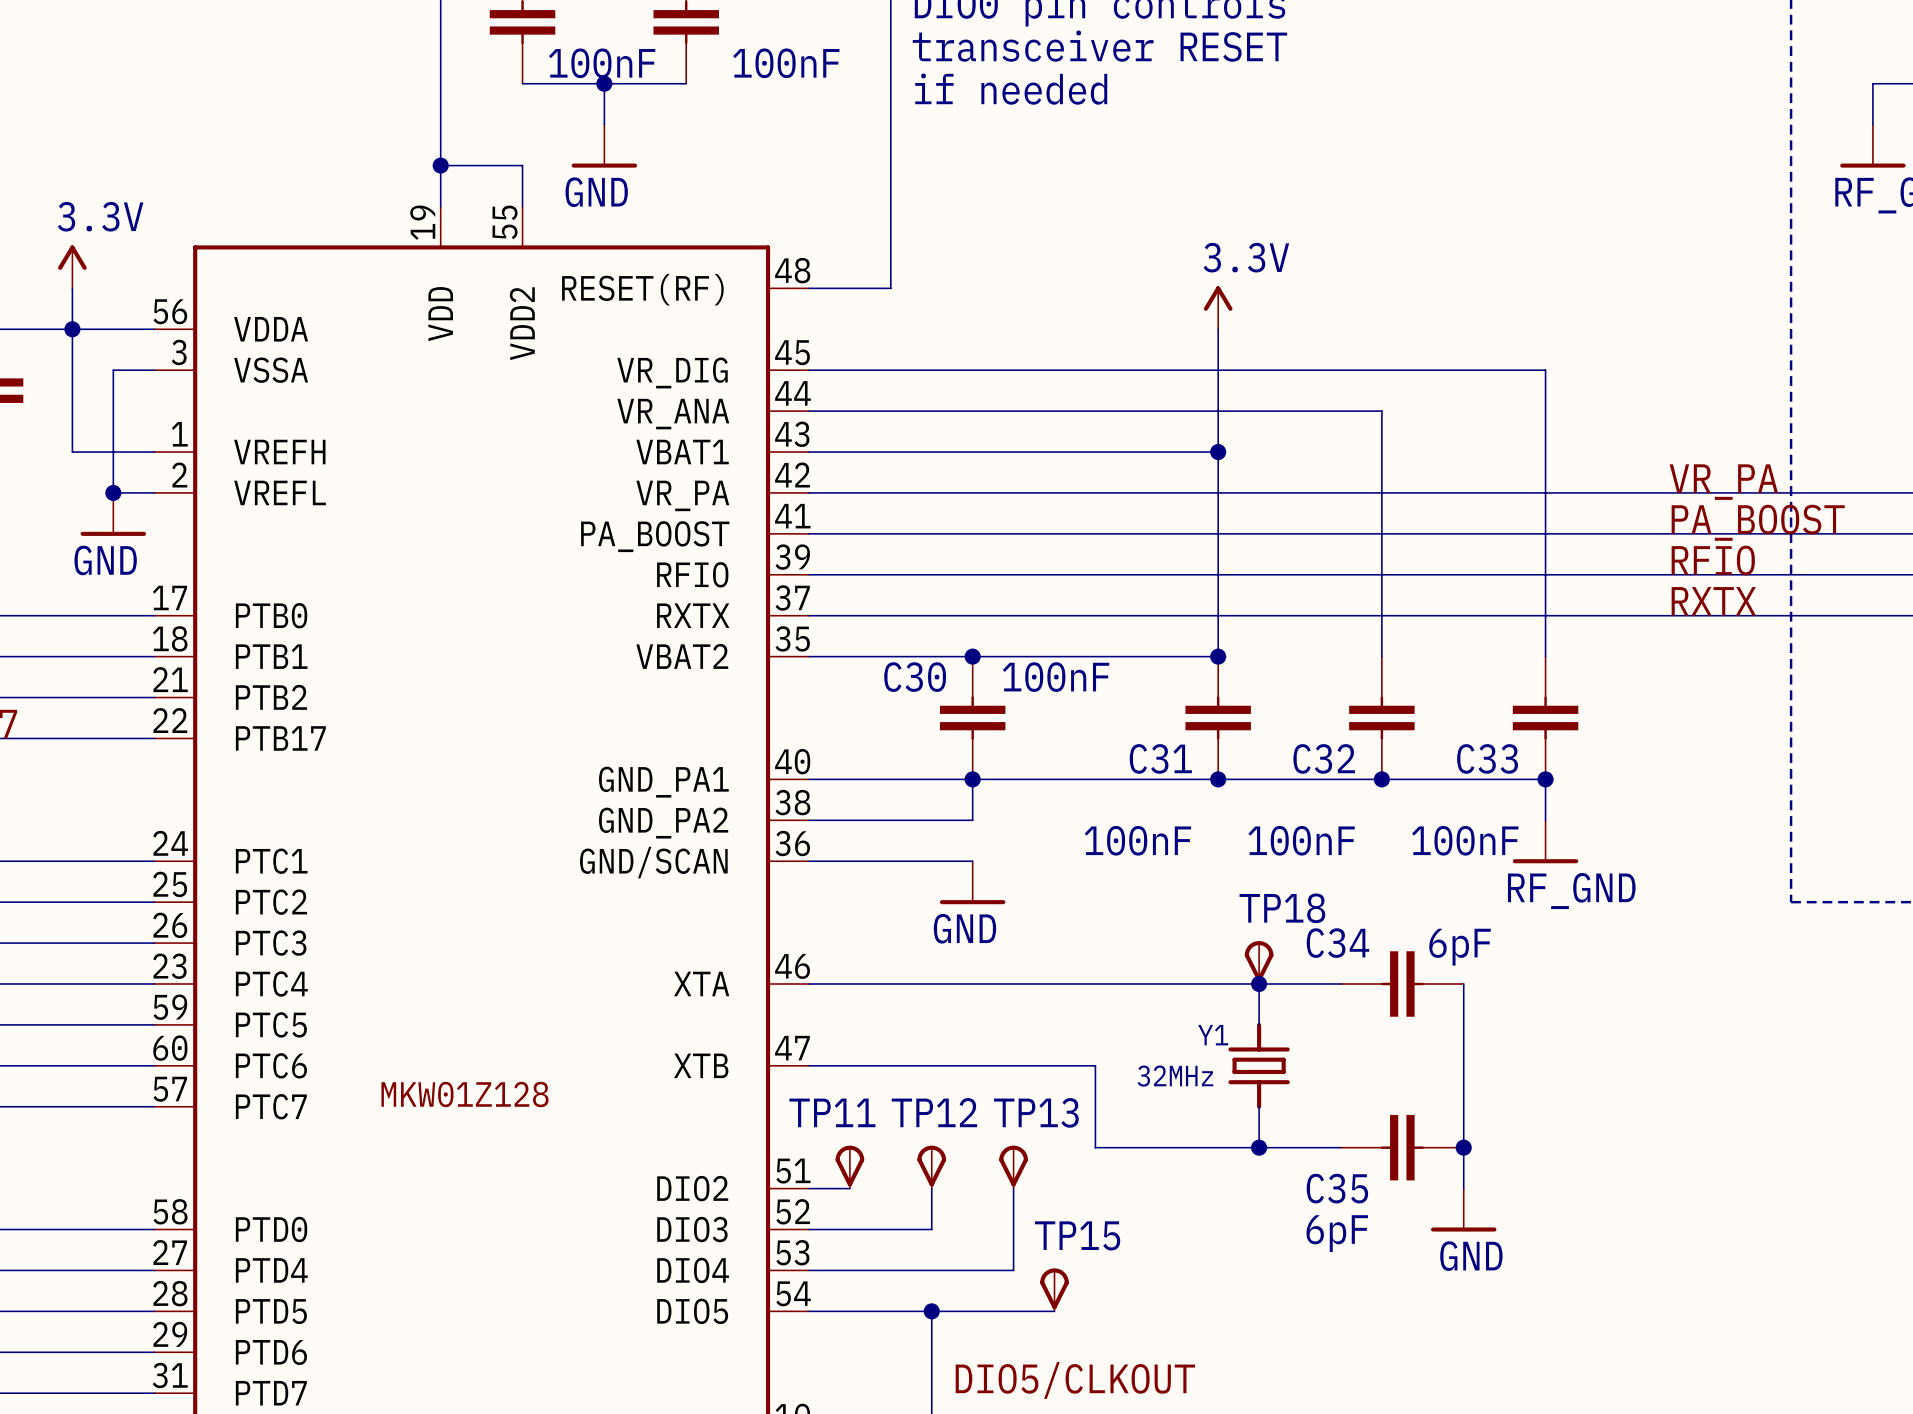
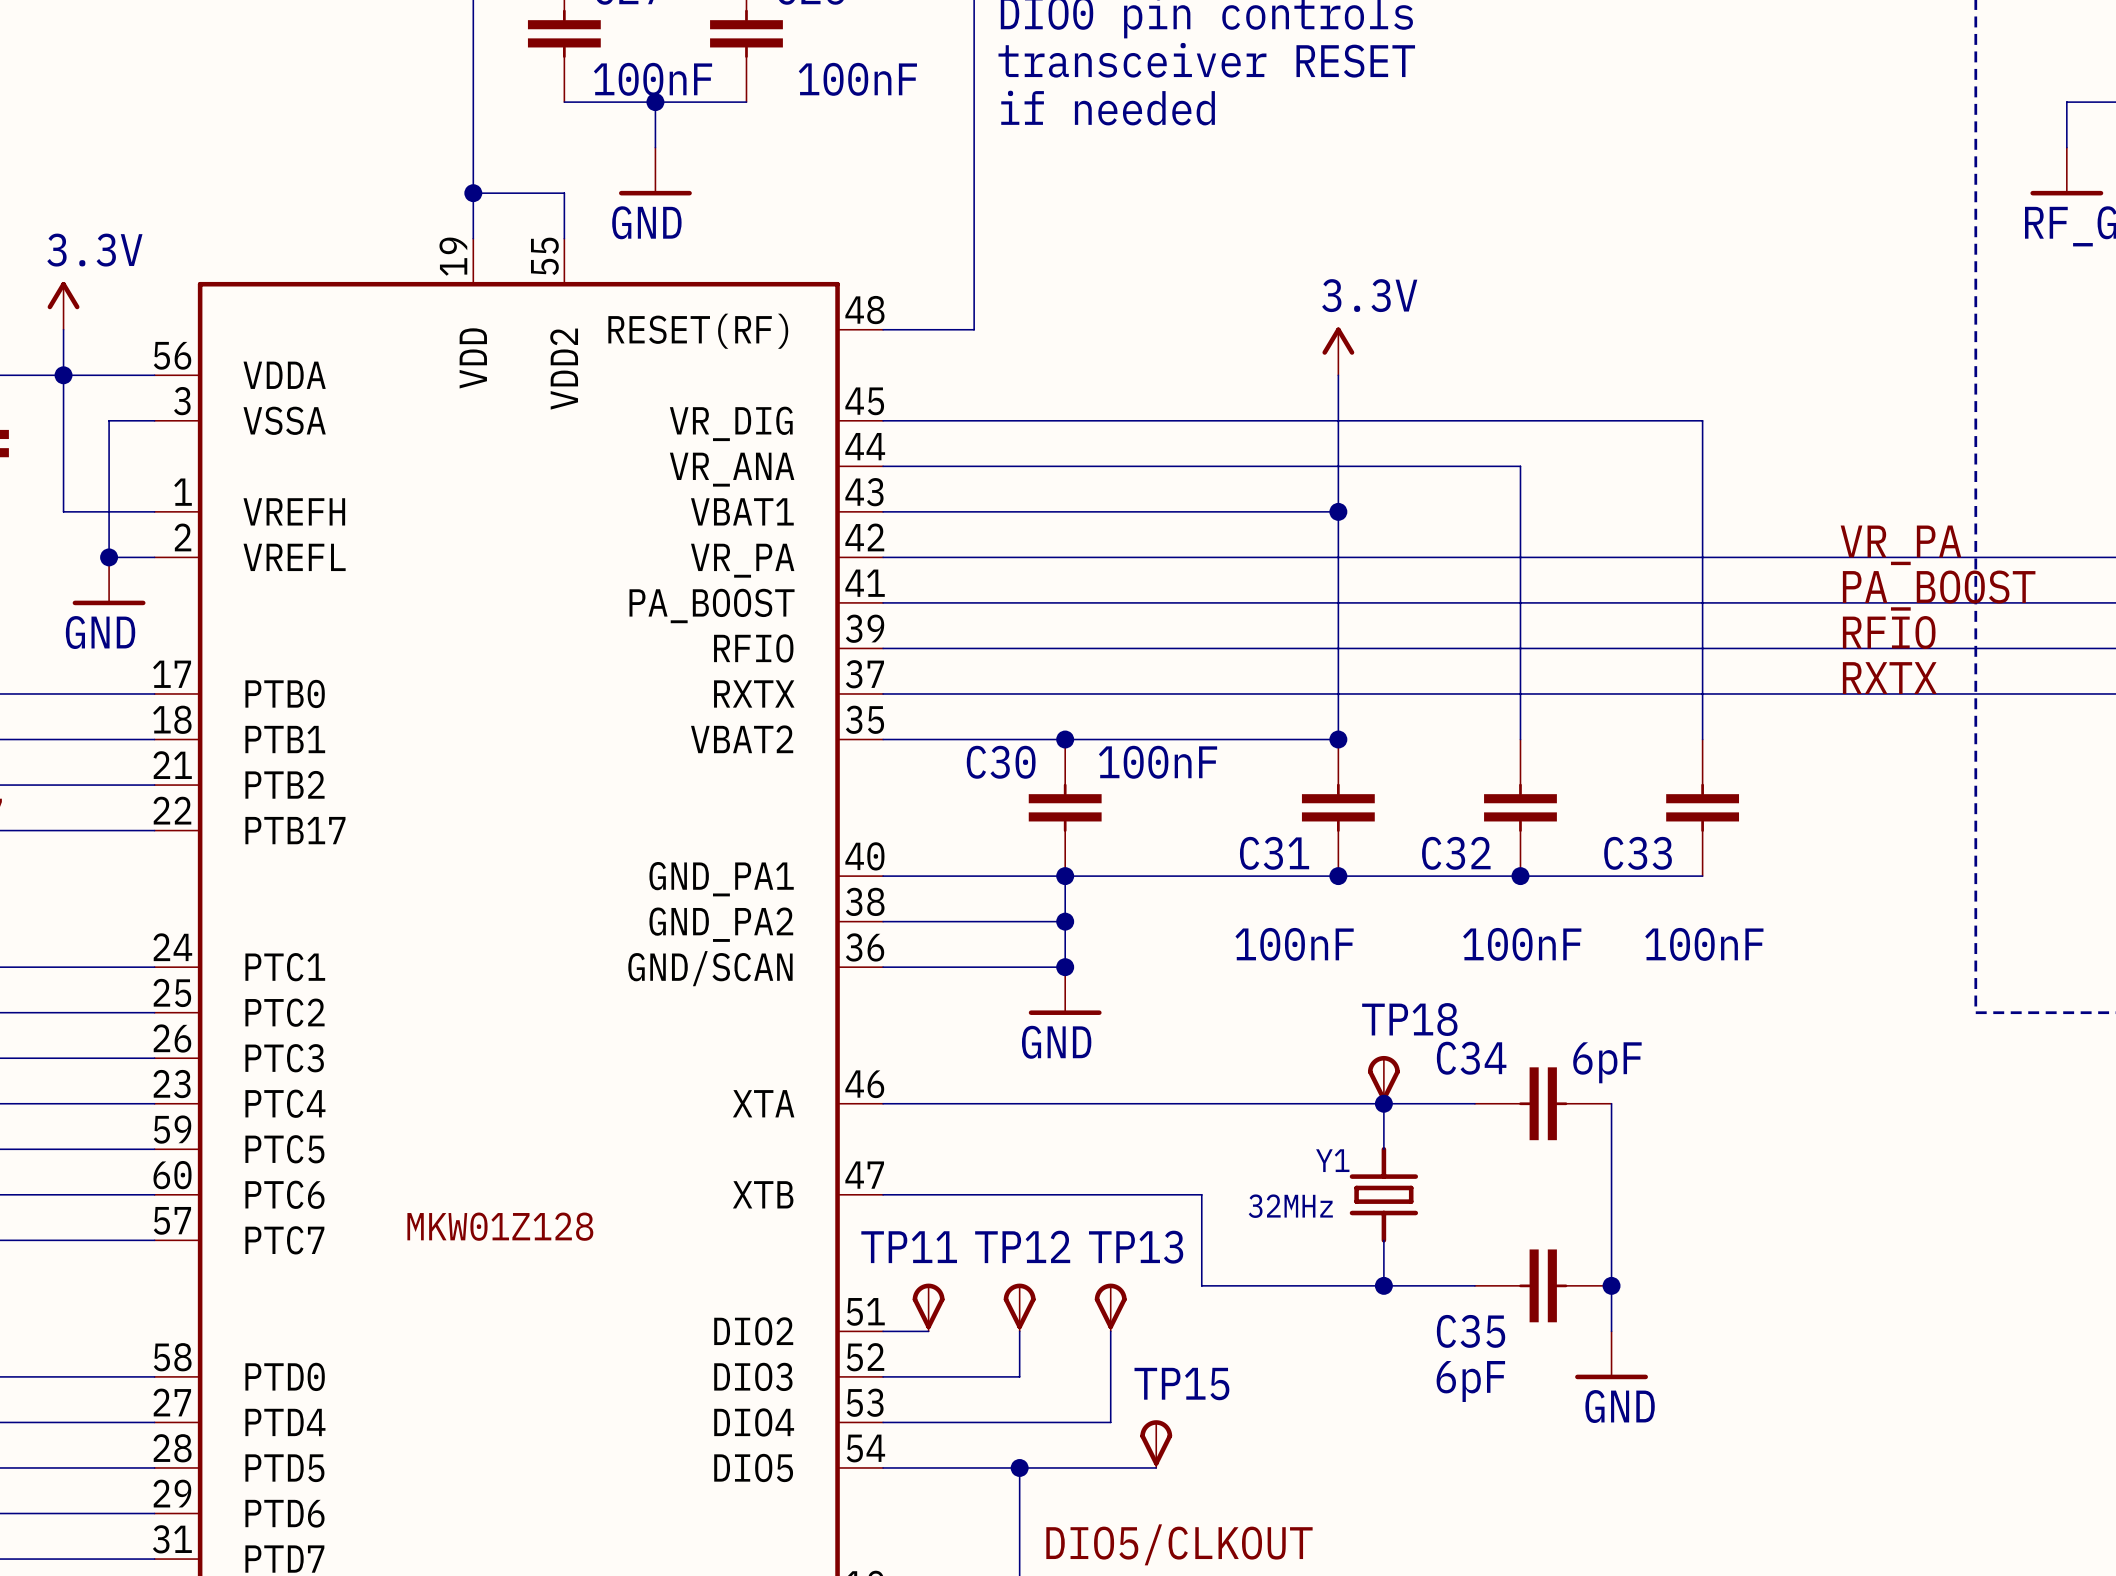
wire: (1545, 779) (1545, 820) -> none
junction: (1545, 779) -> none
wire: none -> (1065, 921) (1065, 967)
junction: none -> (1065, 921)
C31 value position: 100nF (1137, 840) -> 100nF (1294, 944)
C32 value position: 100nF (1301, 840) -> 100nF (1522, 944)
C33 value position: 100nF (1465, 840) -> 100nF (1704, 944)
power symbol: RF_GND (1545, 841) -> none
junction: none -> (1065, 967)

